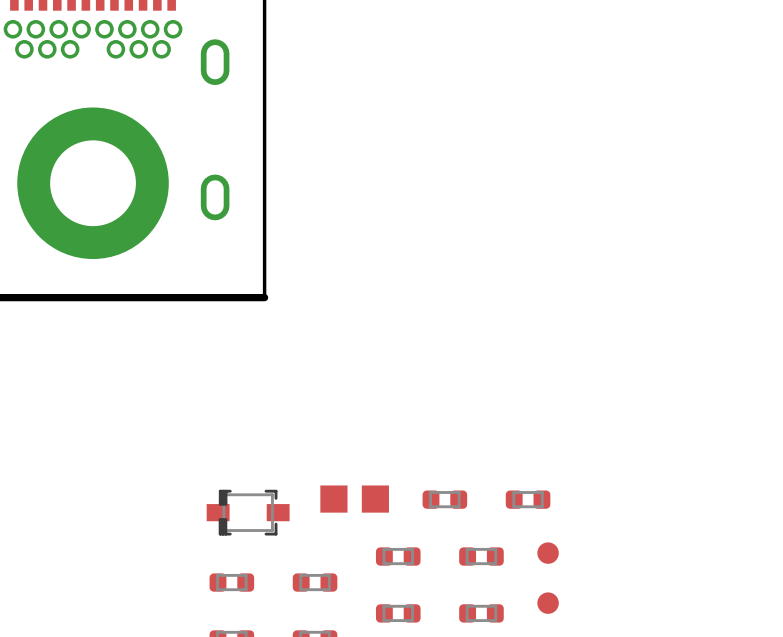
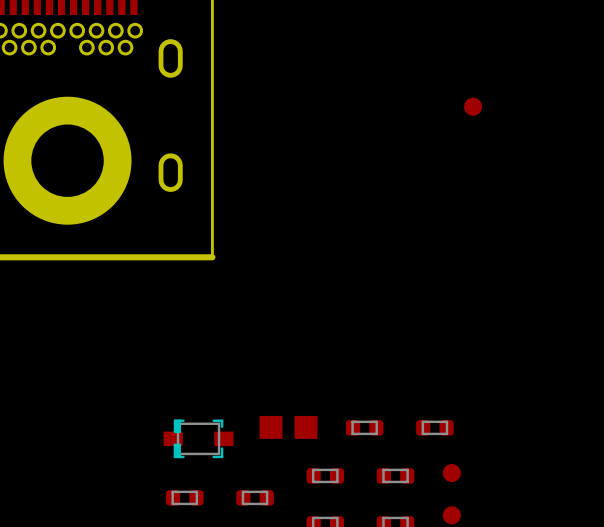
part: none -> (473, 106)

